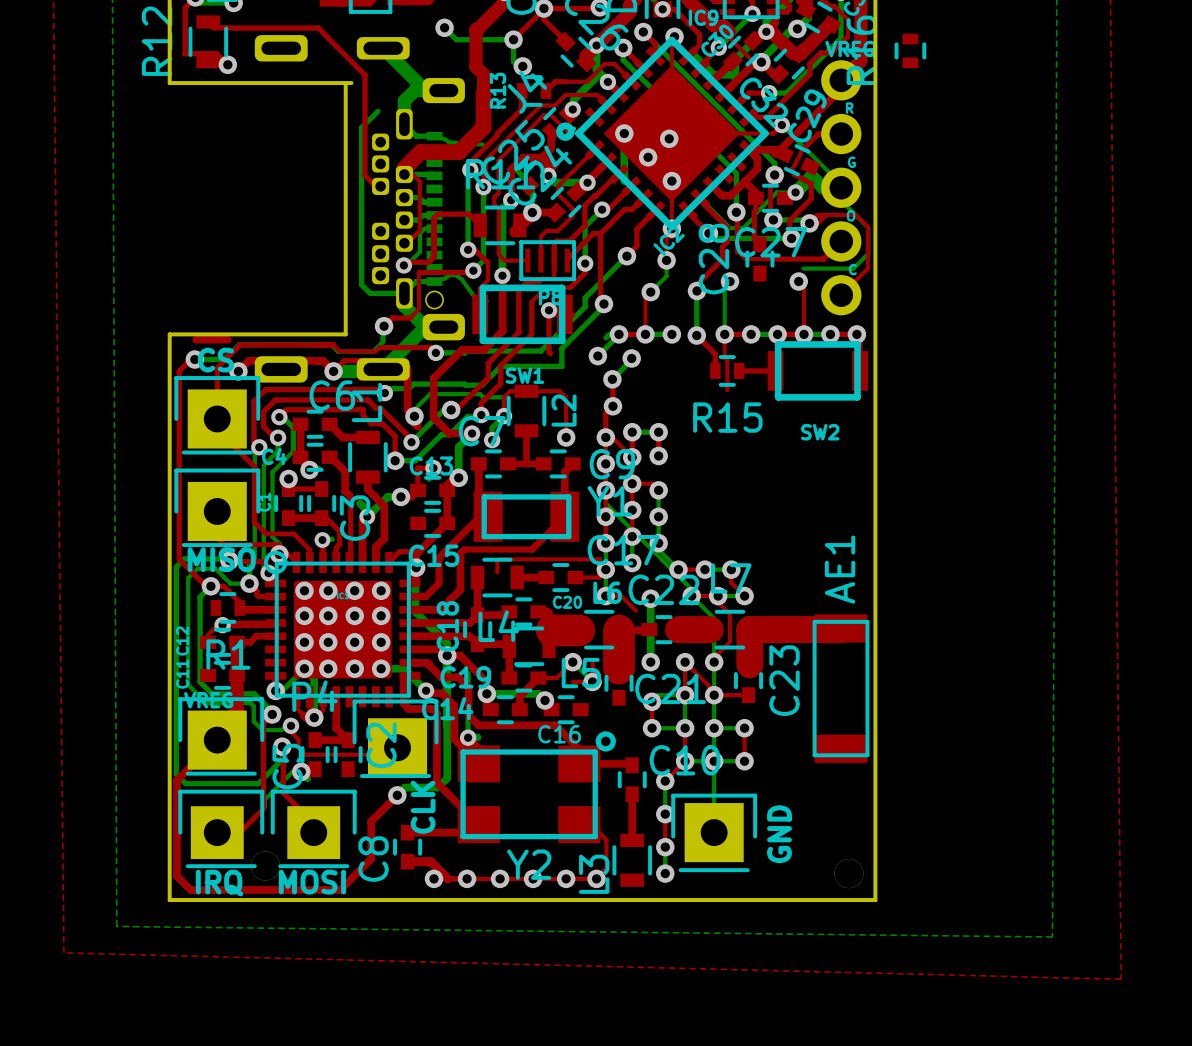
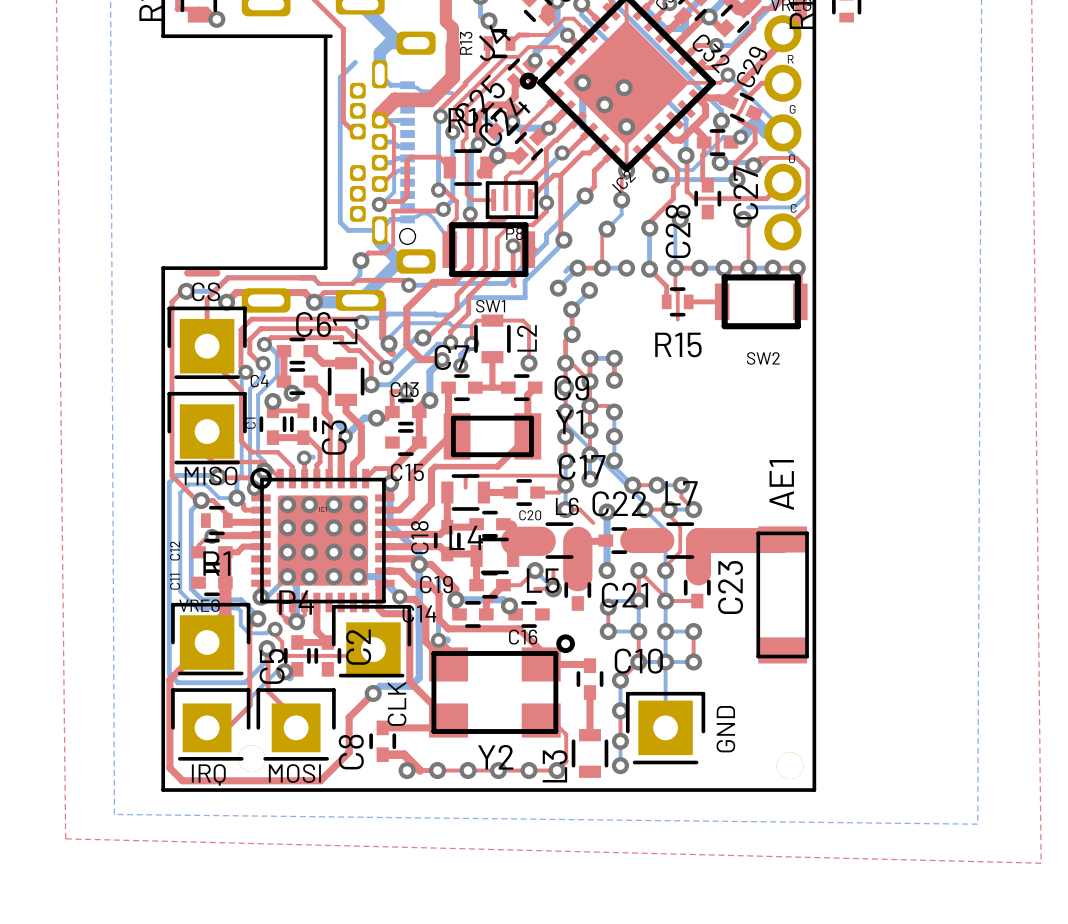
C27 name rotation: 0° (771, 242) -> 90° counterclockwise (745, 192)
C28 name position: C28 (713, 259) -> C28 (678, 231)

